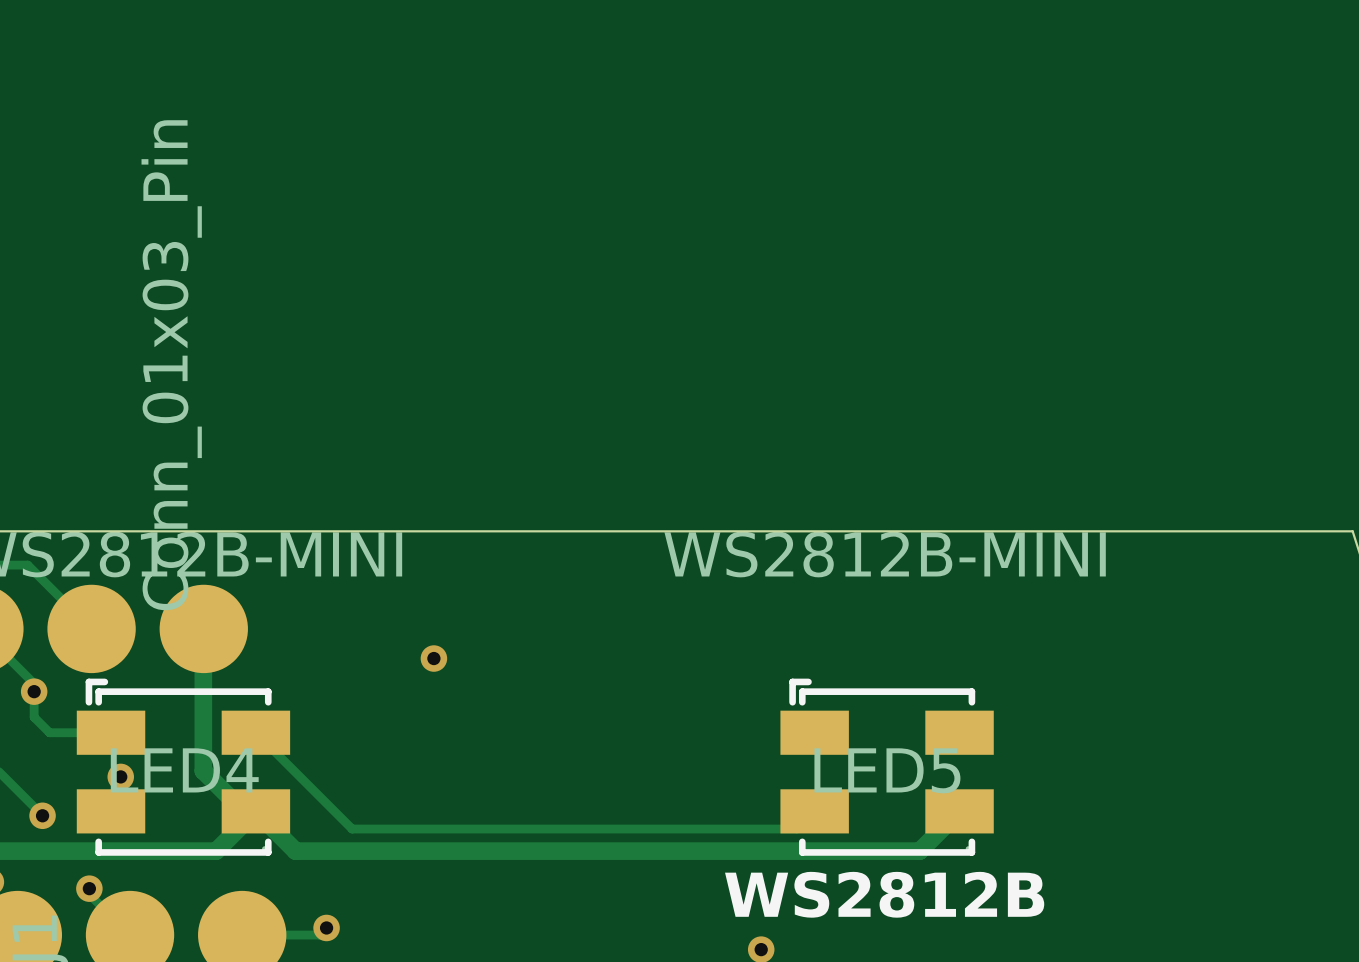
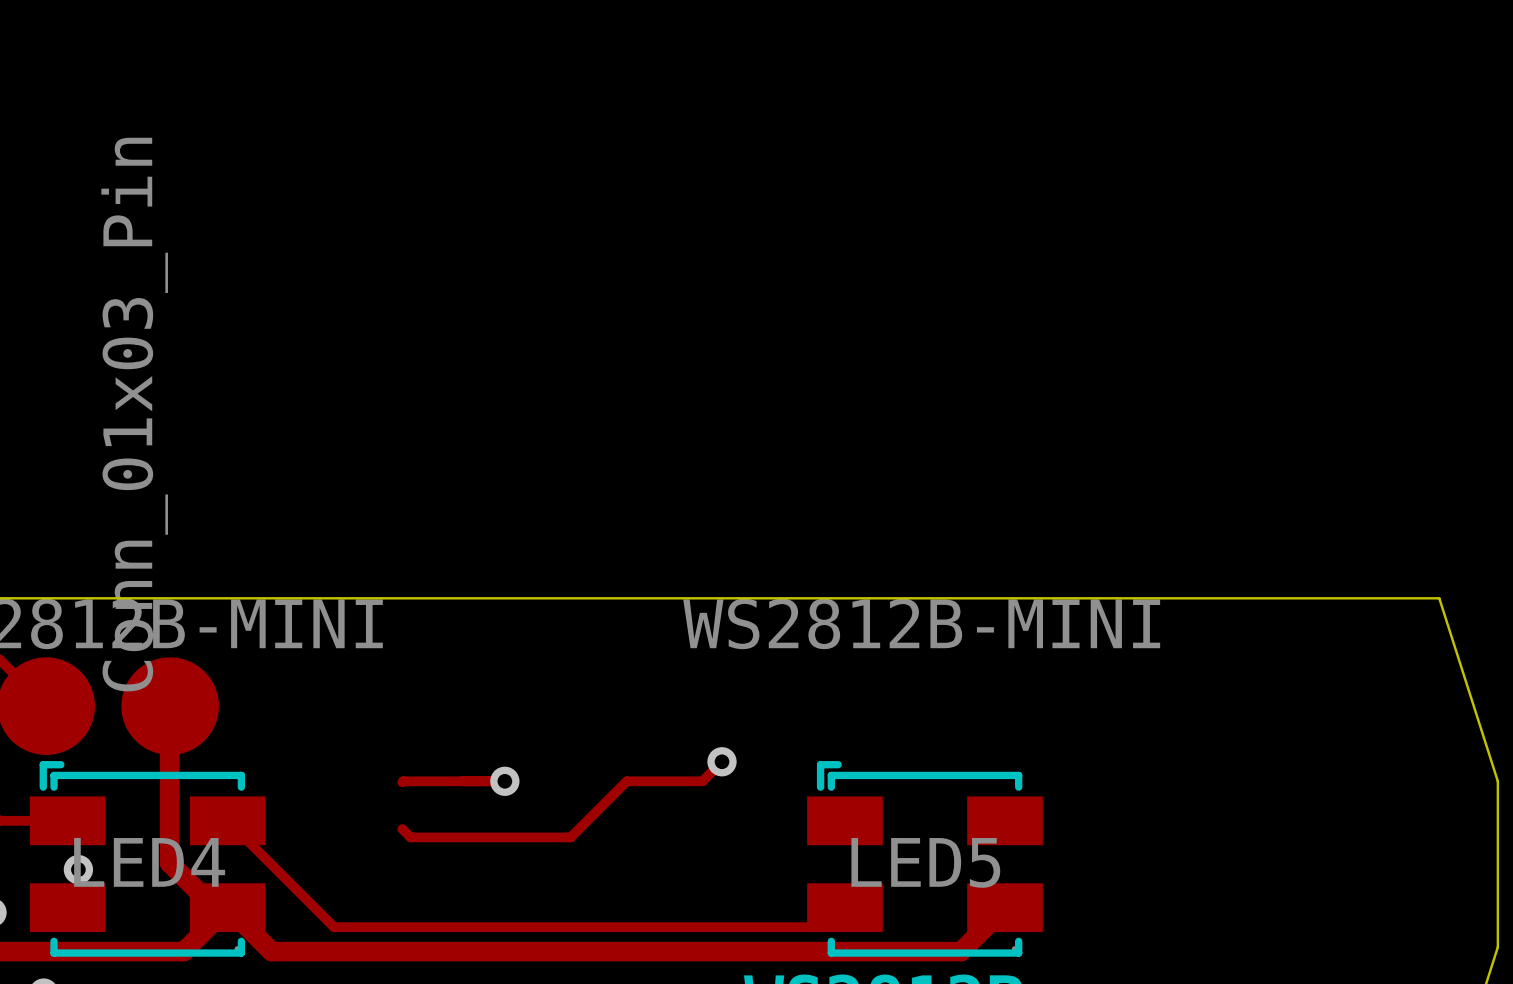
via position: (433, 658) -> (504, 781)
track: none -> (722, 761) (702, 781) (626, 781) (570, 837) (410, 837) (402, 829)
via: none -> (722, 761)
track: none -> (504, 781) (402, 782)

